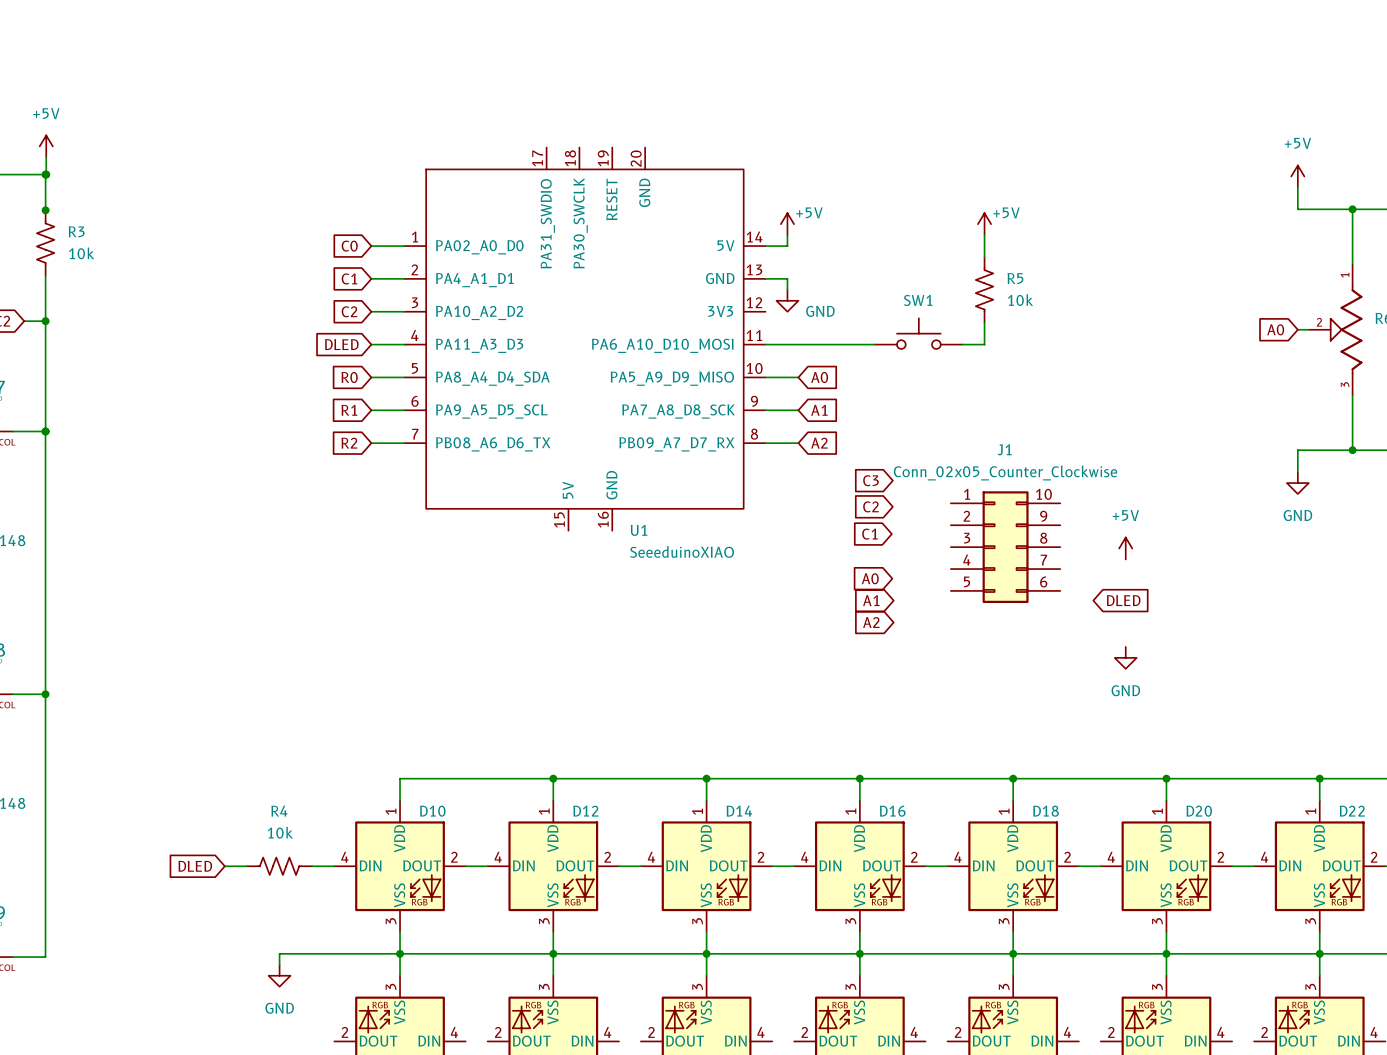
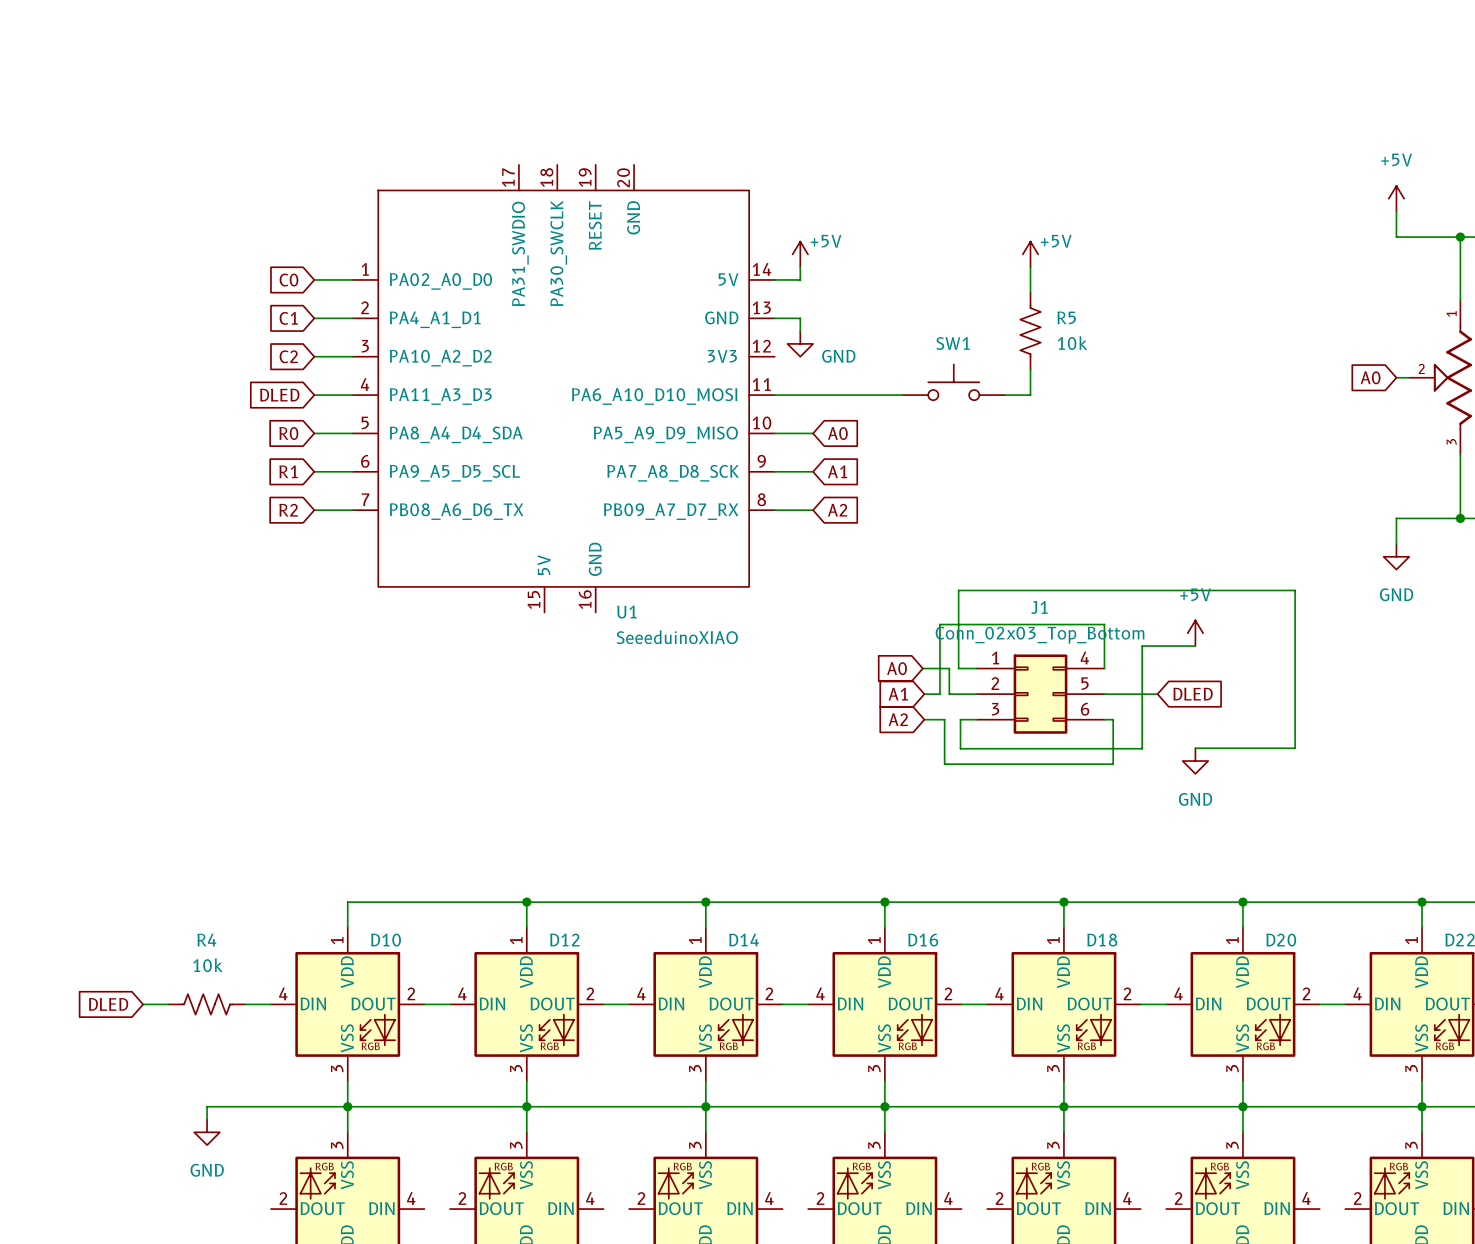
J1 name position: J1 (1004, 449) -> J1 (1039, 607)
J1 value: Conn_02x05_Counter_Clockwise (1005, 472) -> Conn_02x03_Top_Bottom (1040, 635)
global label: C3 (871, 480) -> none
J1 symbol: [950, 491, 1061, 603] -> [976, 654, 1105, 734]
global label: C2 (870, 506) -> none
global label: C1 (869, 534) -> none
wire: none -> (1195, 646) (1142, 646) (1142, 748) (960, 748) (960, 719) (976, 719)
wire: none -> (922, 668) (949, 668) (949, 694) (976, 694)
wire: none -> (976, 668) (958, 668) (958, 590) (1295, 590) (1295, 748) (1195, 748)
wire: none -> (1104, 668) (1104, 624) (939, 624) (939, 694) (924, 694)
wire: none -> (1104, 694) (1157, 694)
wire: none -> (924, 719) (944, 719) (944, 764) (1113, 764) (1113, 719) (1104, 719)

